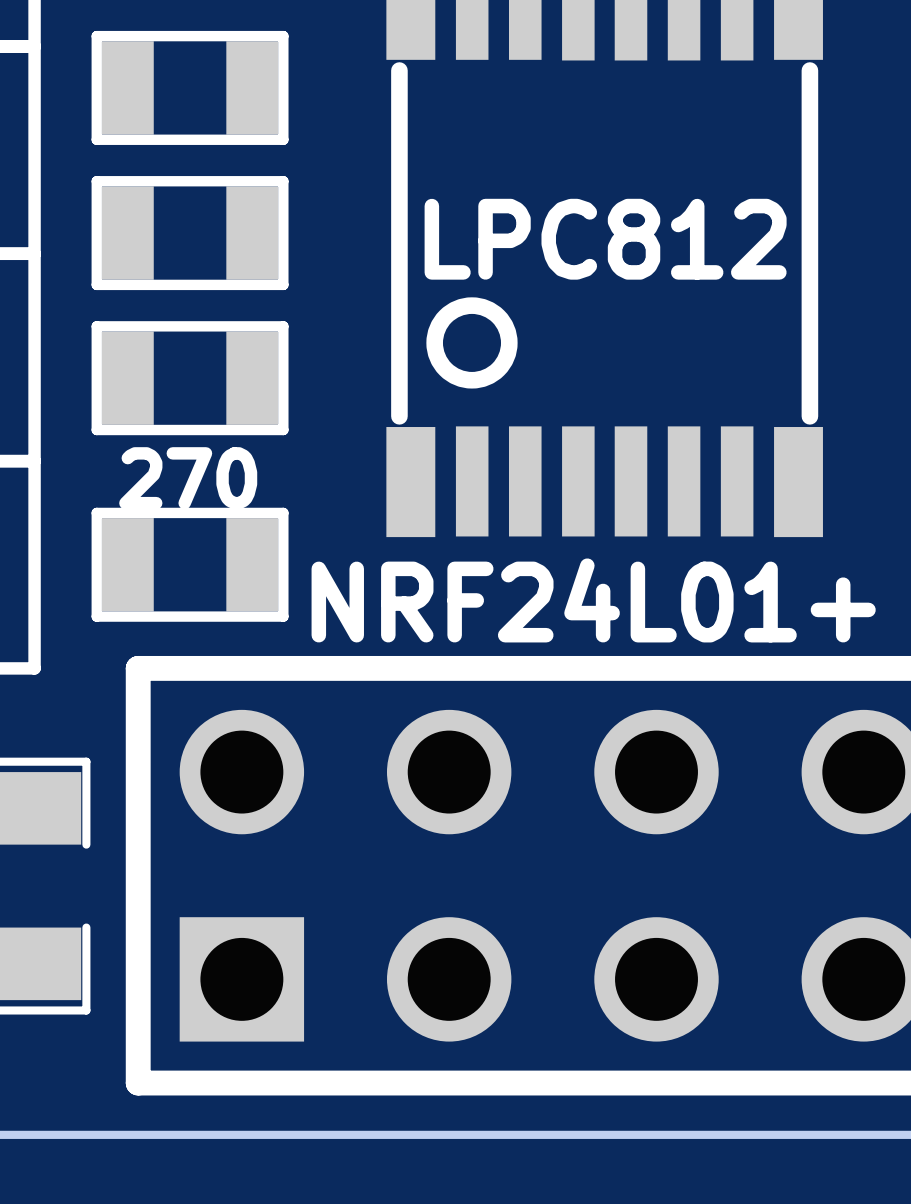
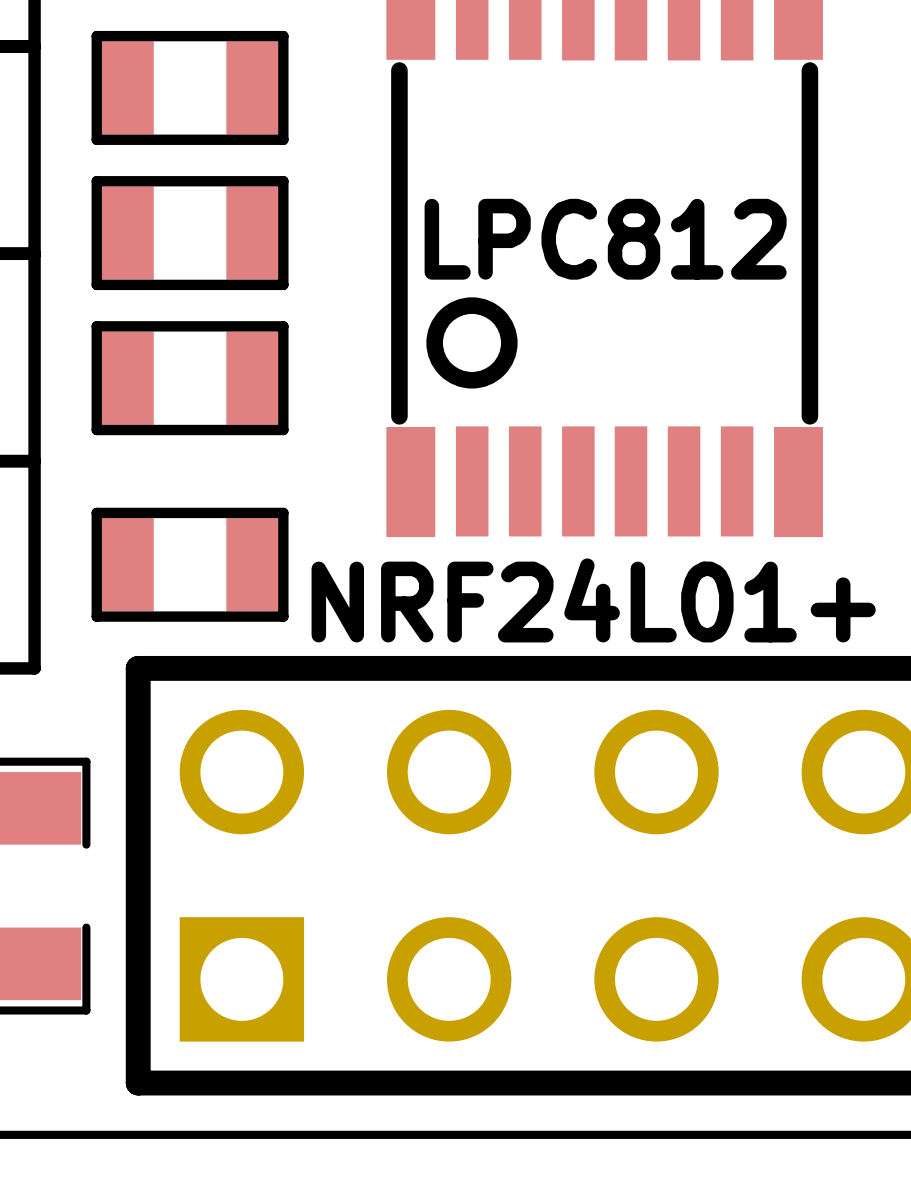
part value: 270 (188, 478) -> none

